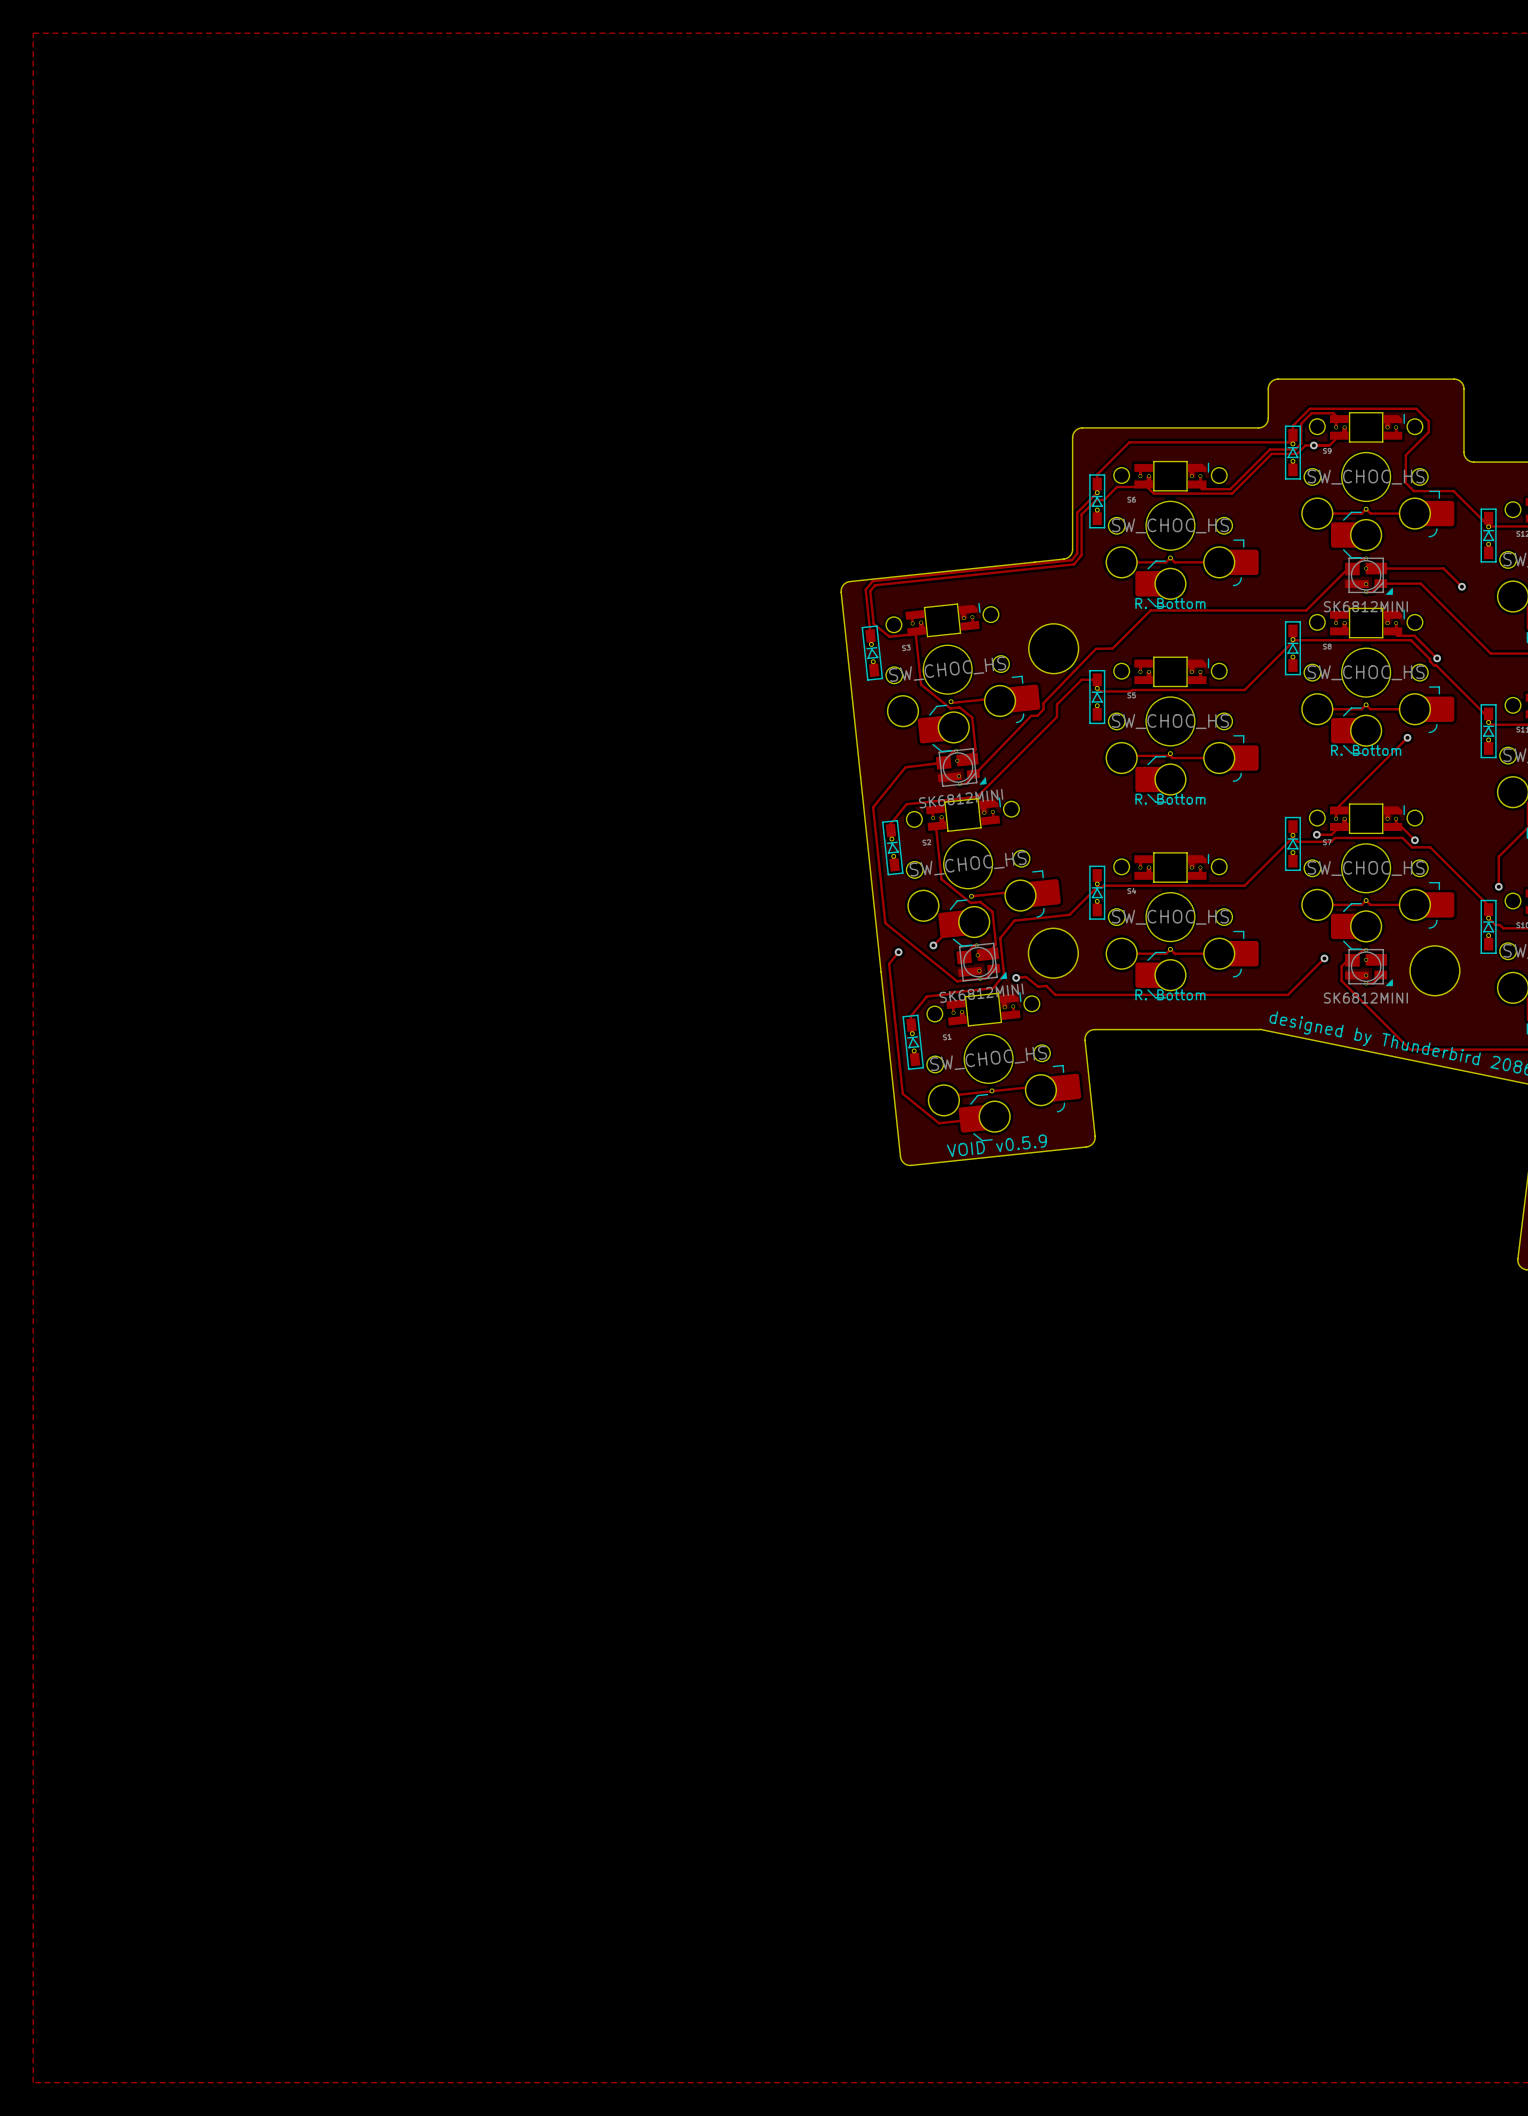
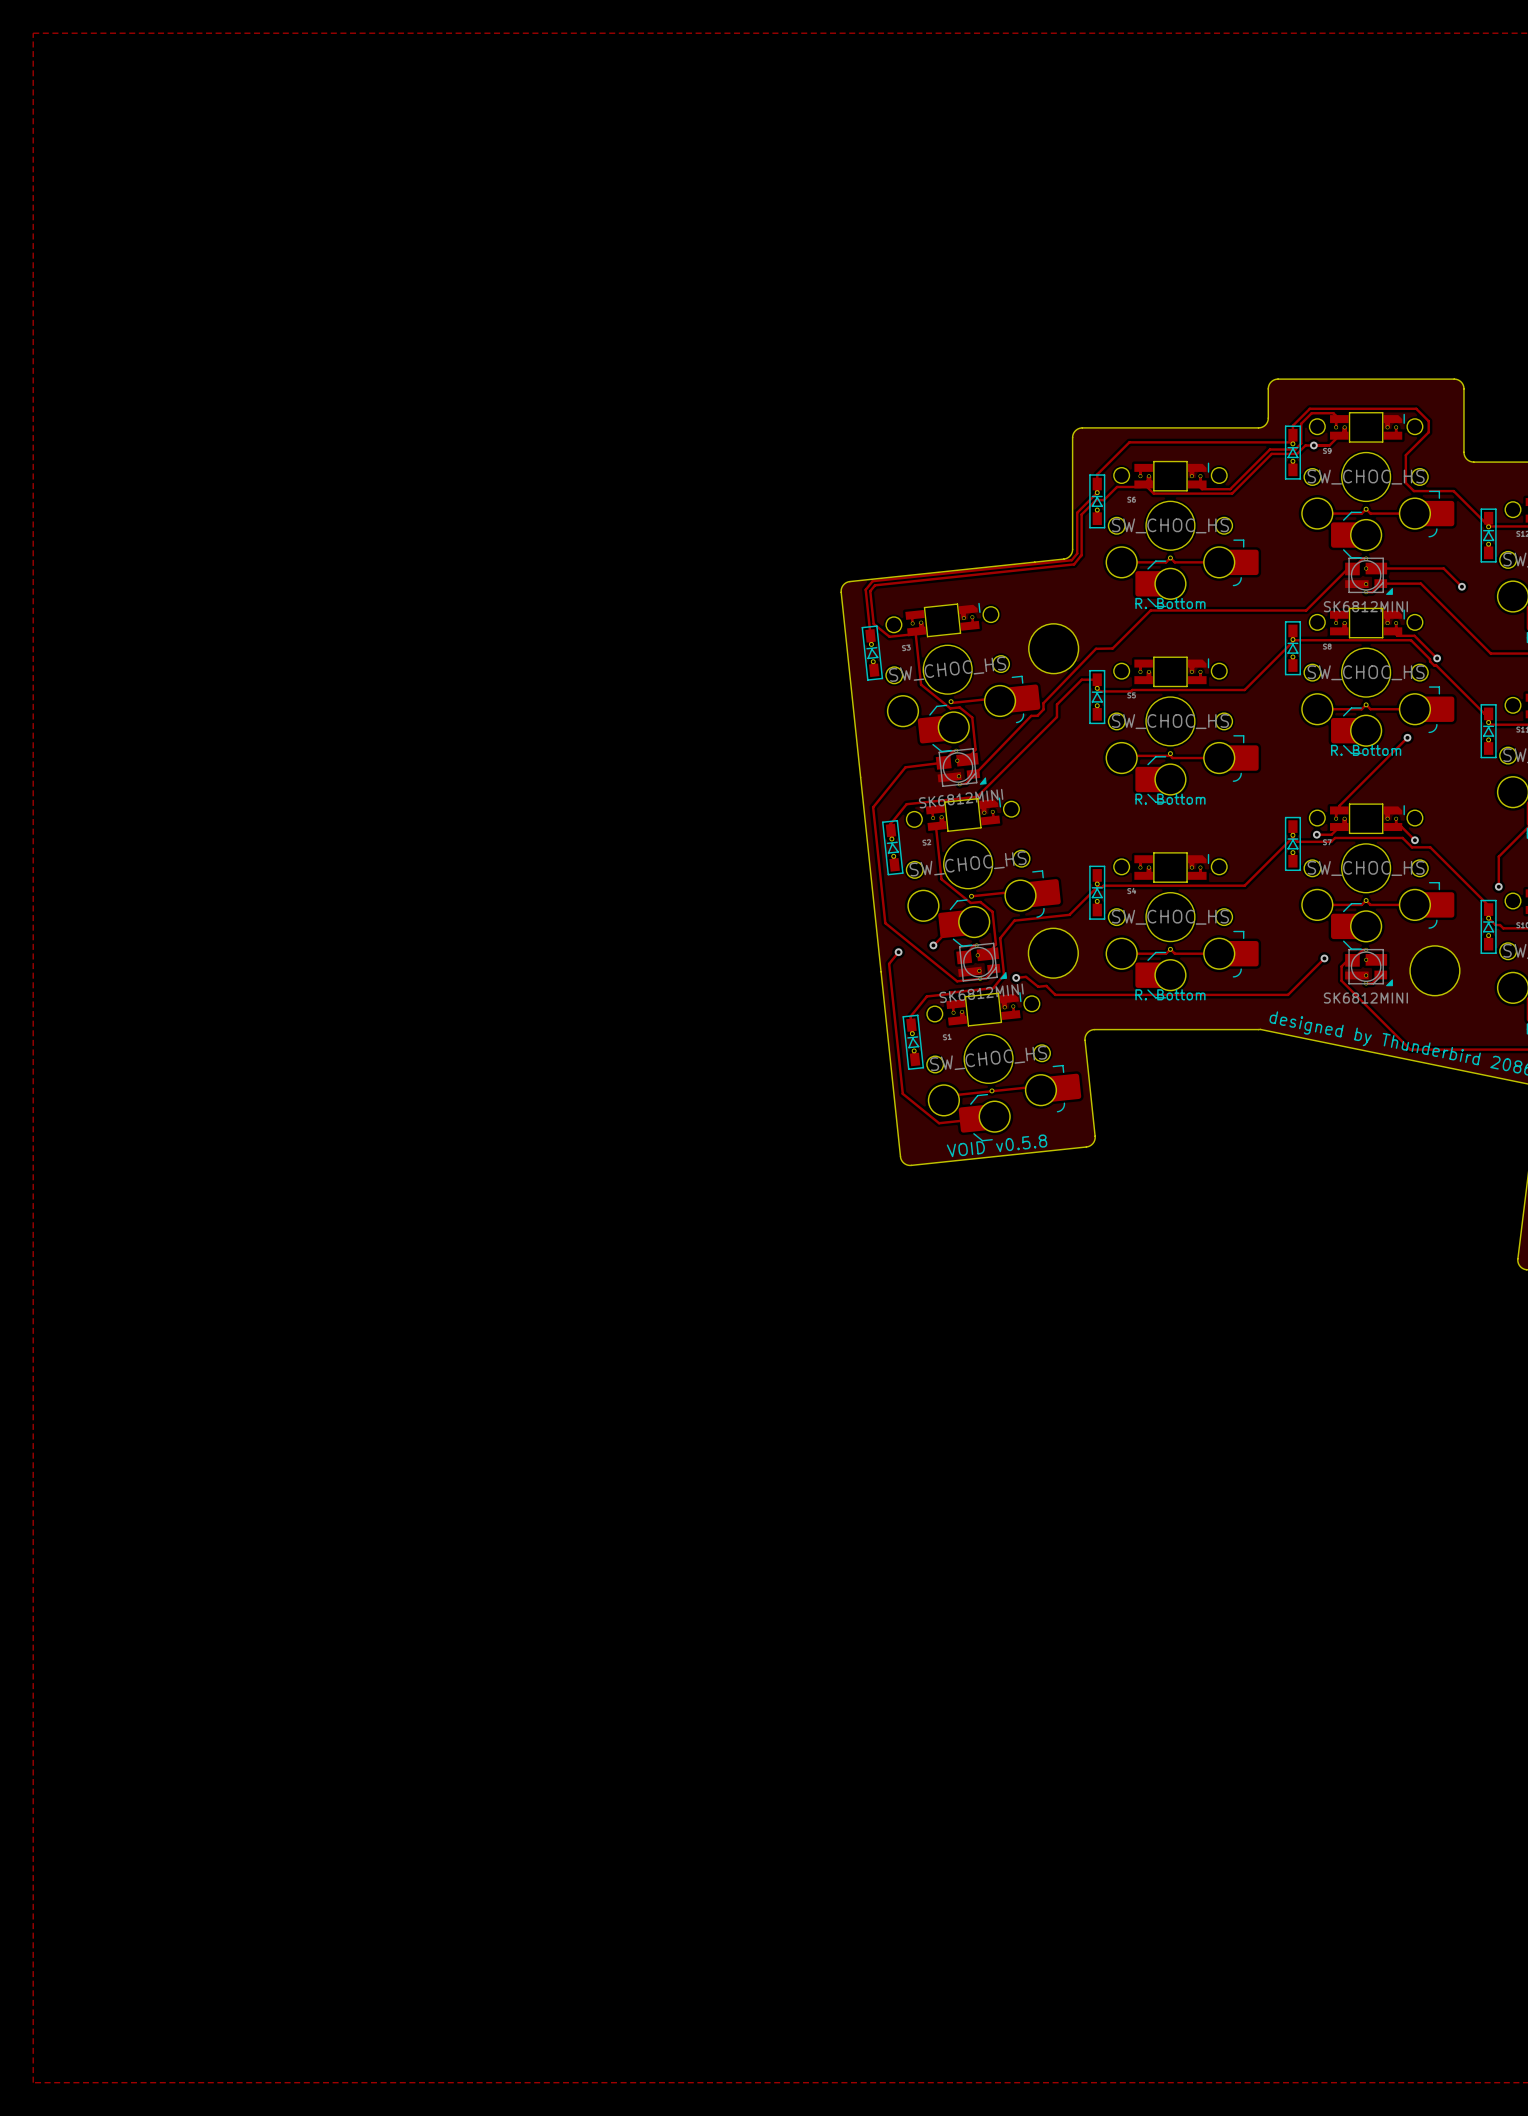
text: VOID v0.5.9 (996, 1145) -> VOID v0.5.8 (997, 1145)

